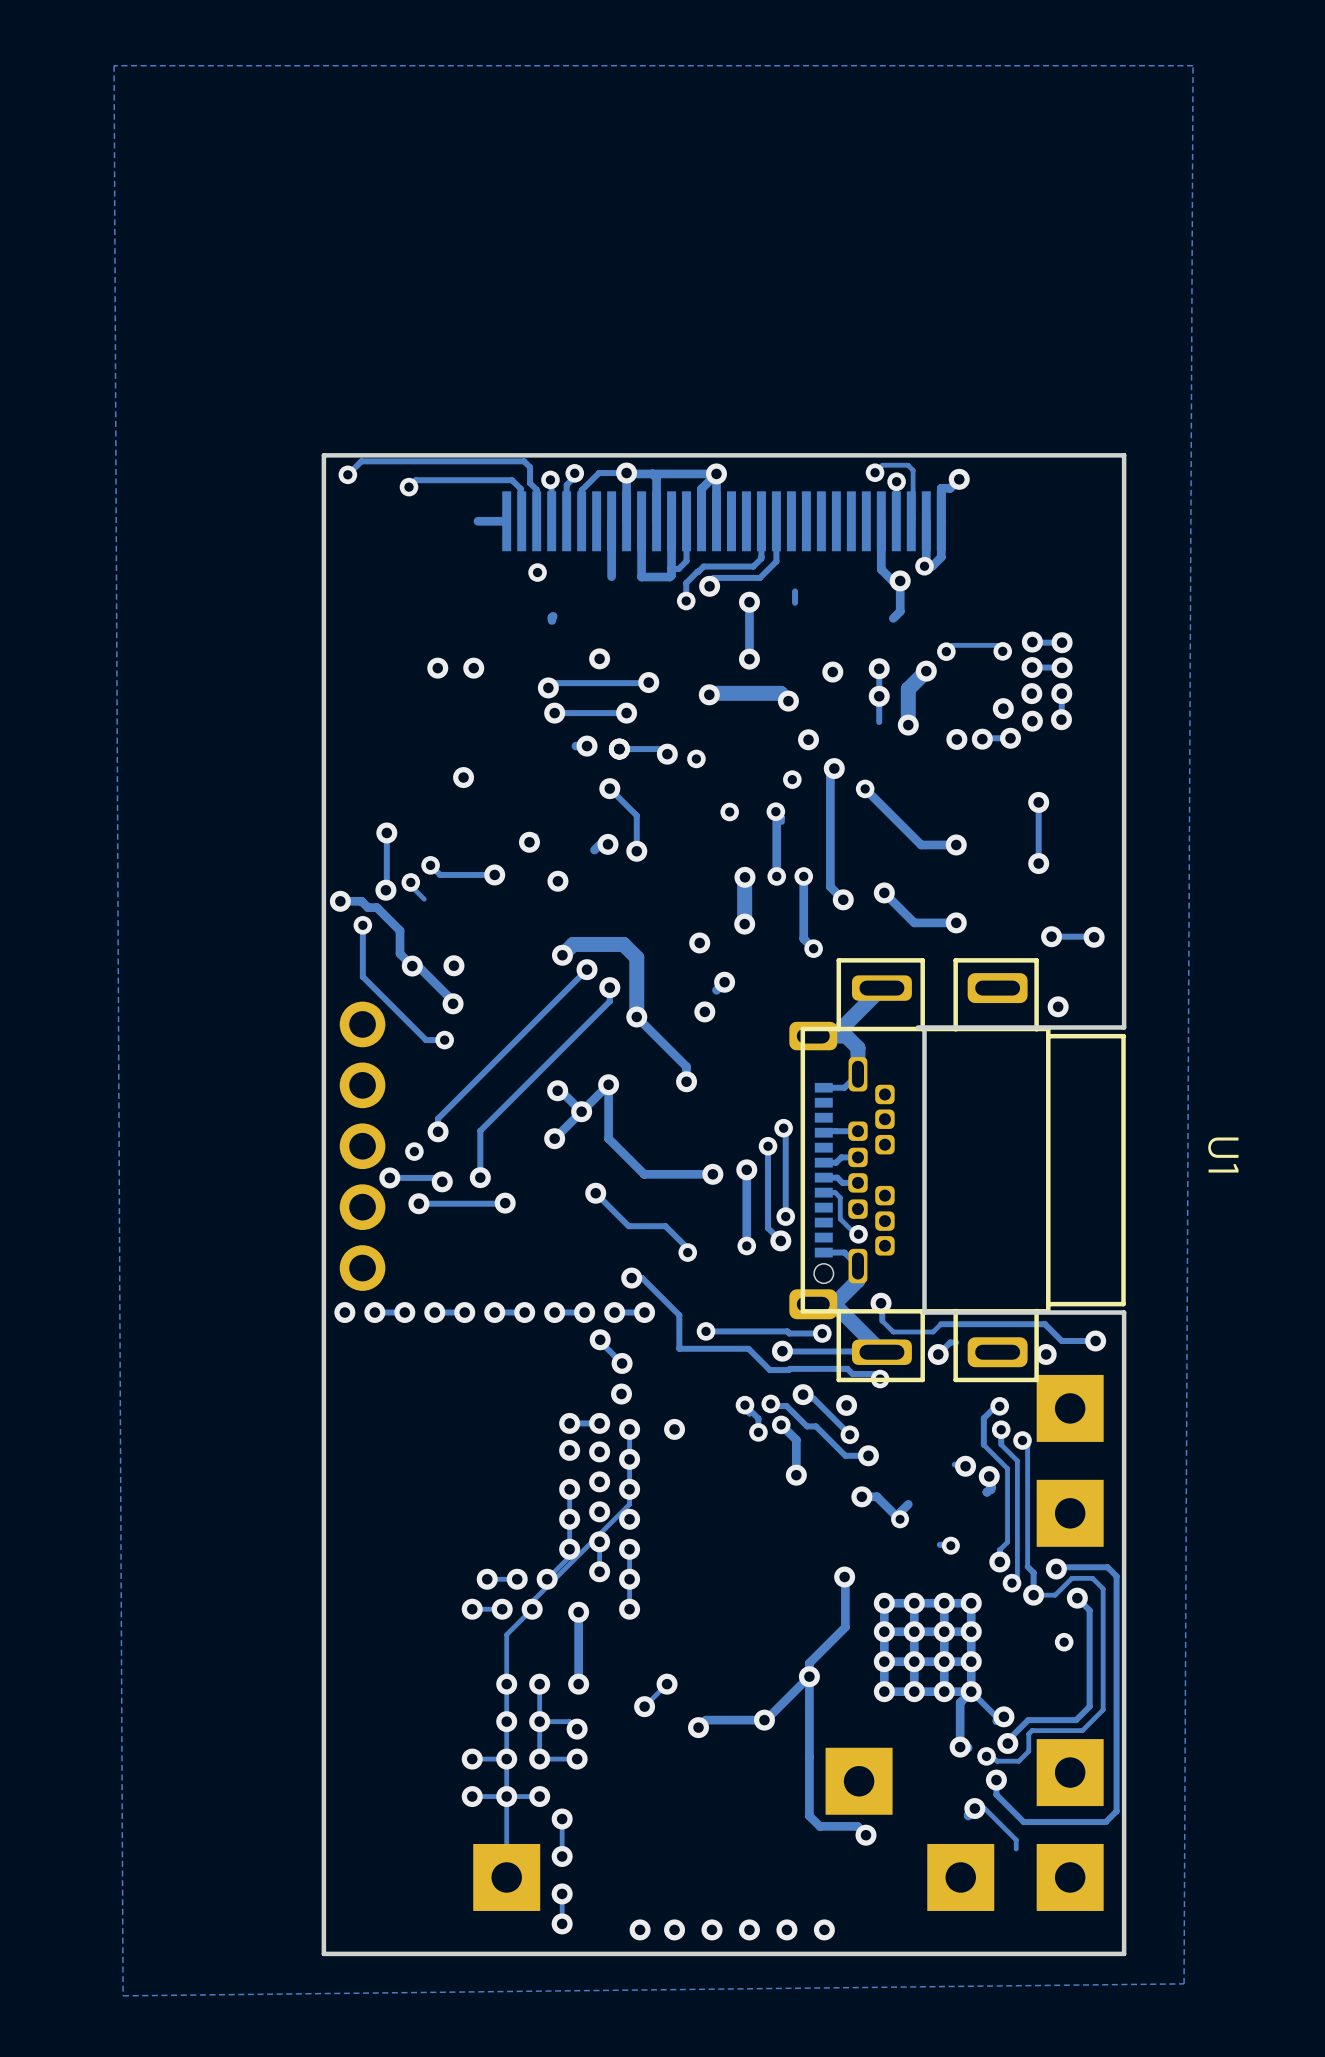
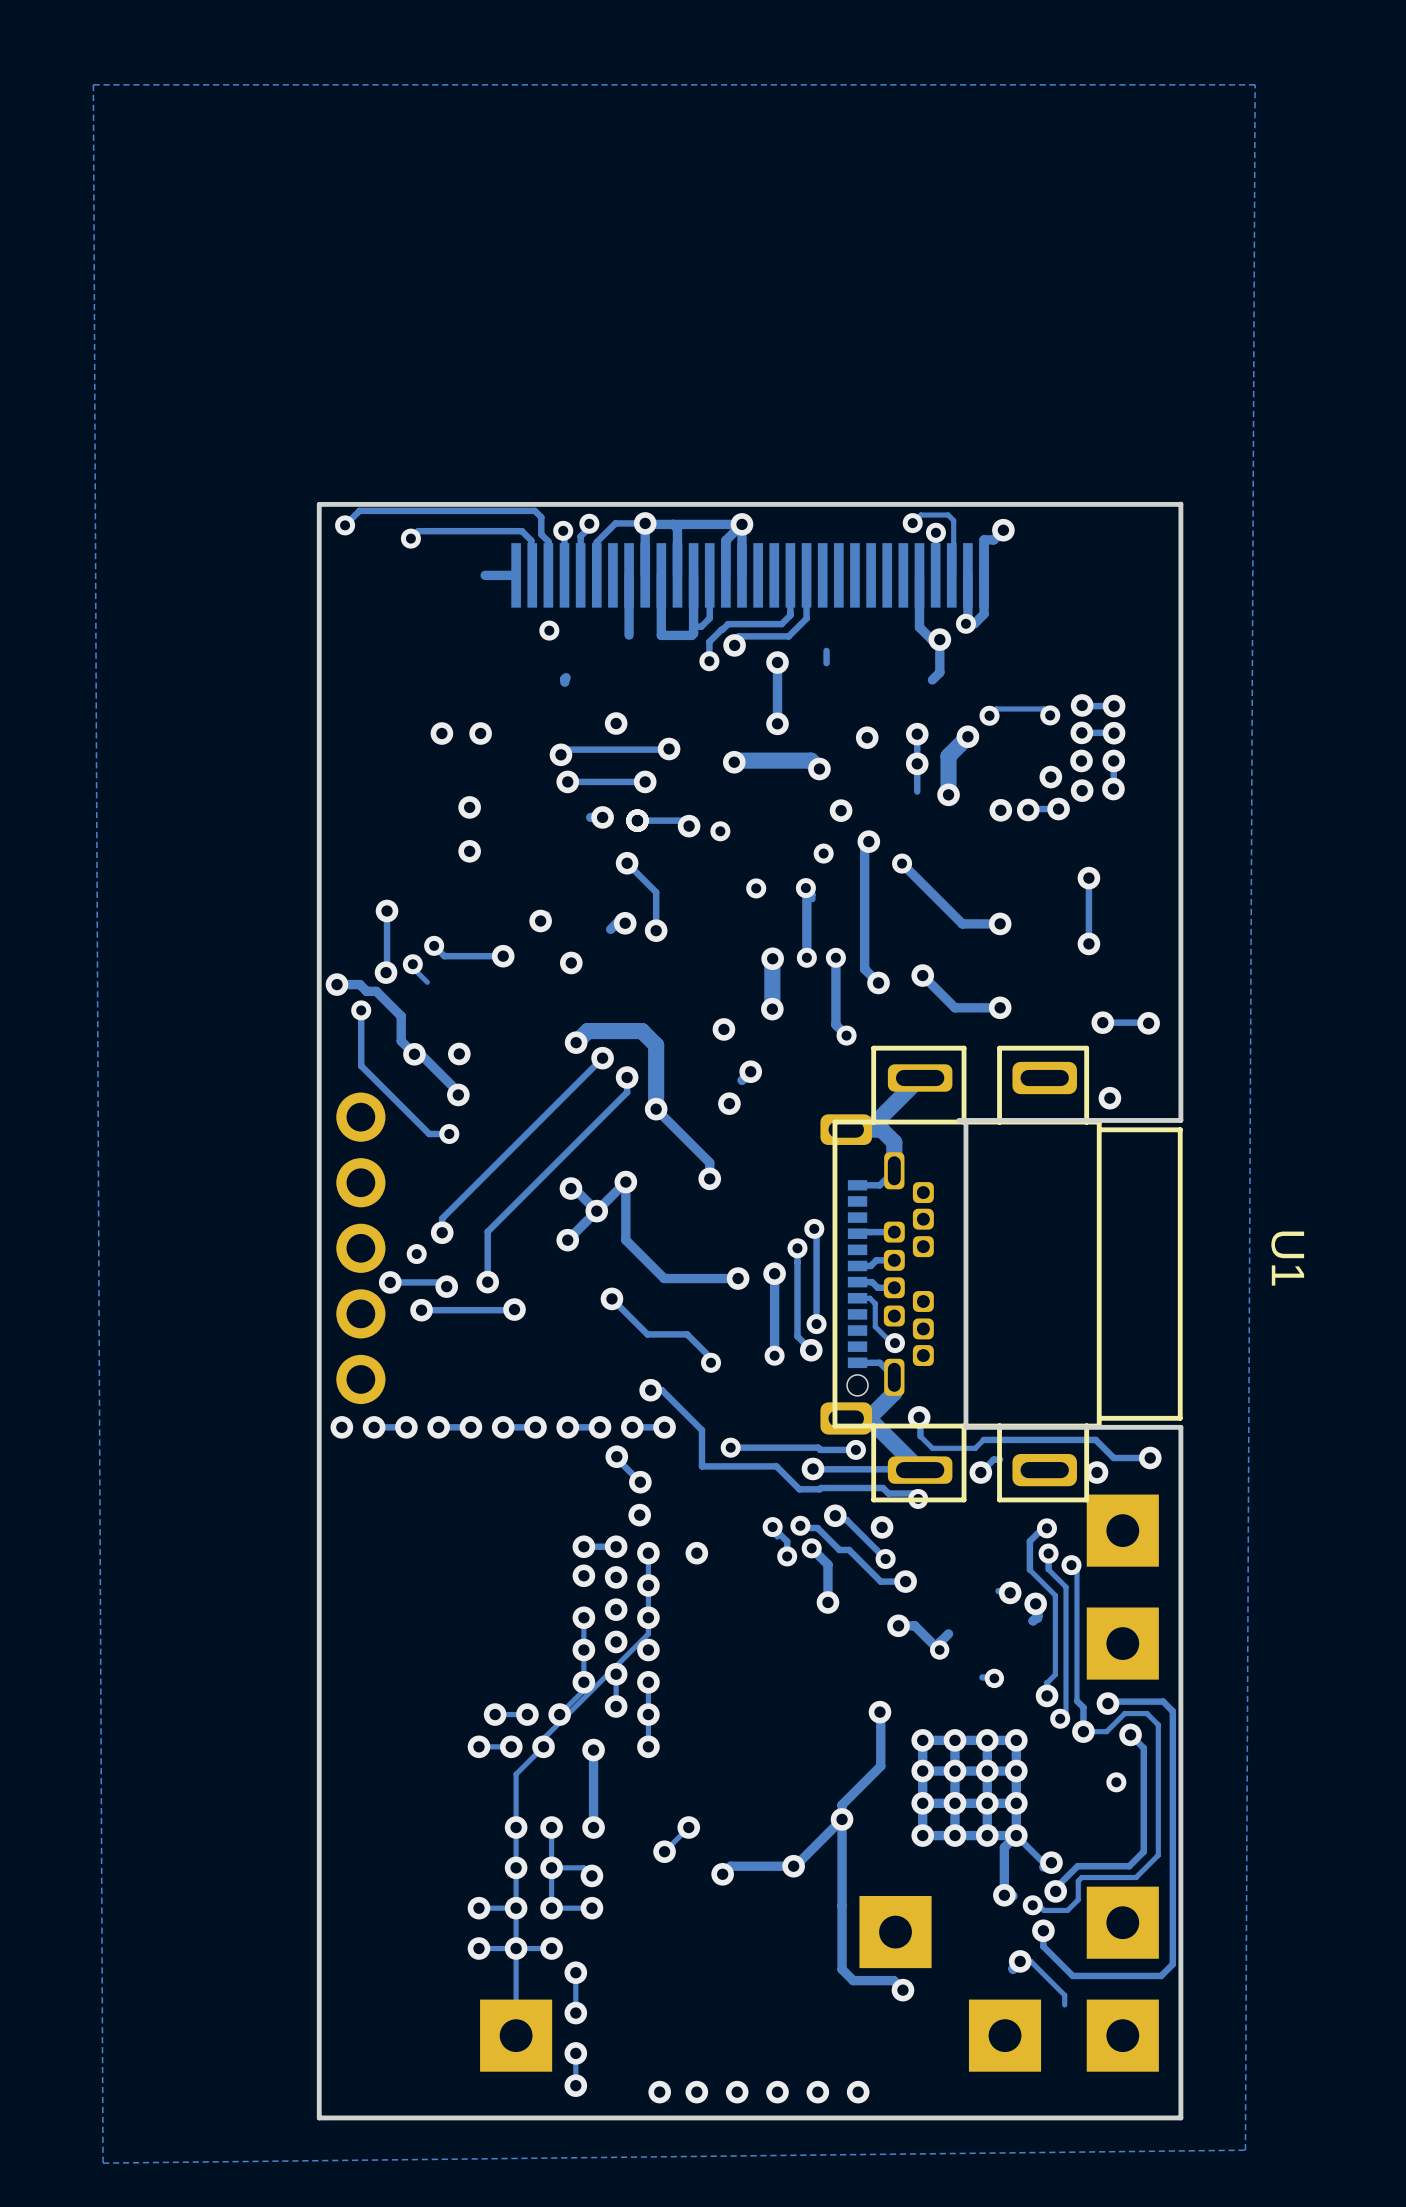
via: none -> (469, 807)

